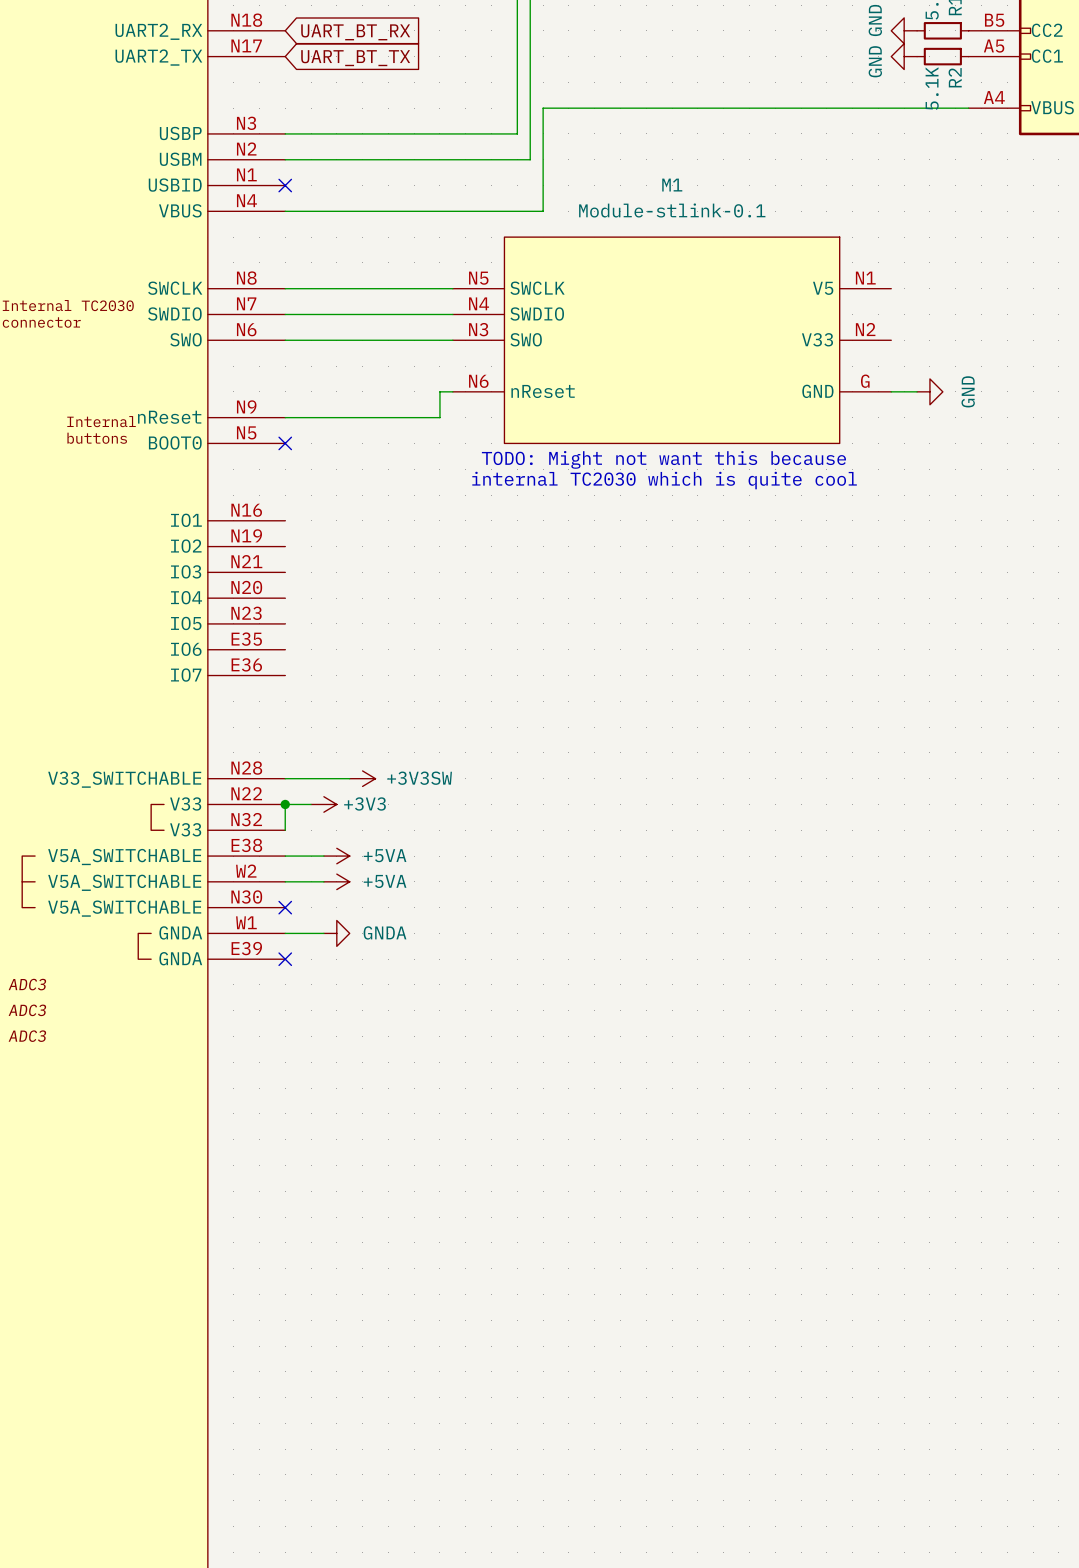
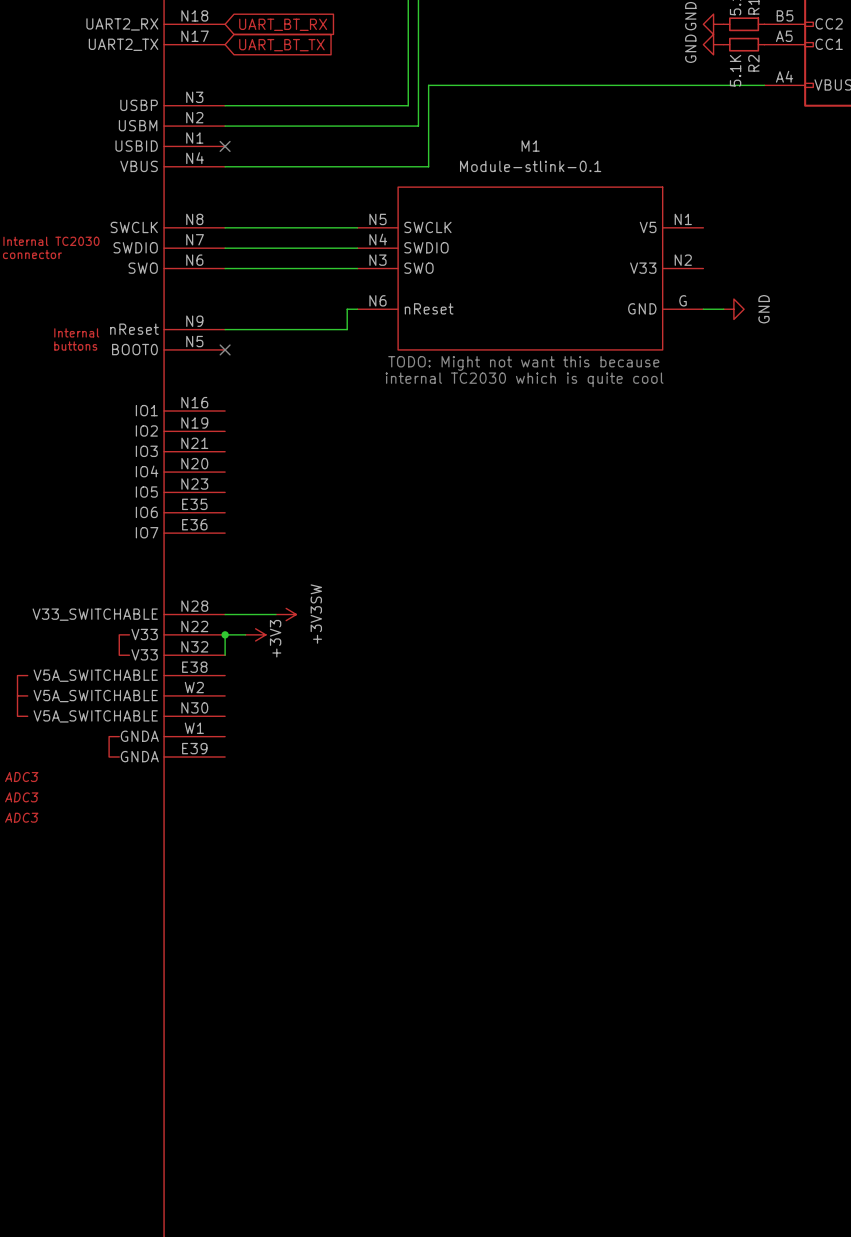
power symbol text rotation: 0° (419, 778) -> 90° counterclockwise (316, 614)
power symbol text rotation: 0° (364, 803) -> 90° counterclockwise (275, 638)
wire: (285, 856) (323, 856) -> none
power symbol: +5VA (336, 856) -> none
wire: (285, 881) (323, 881) -> none
power symbol: +5VA (336, 881) -> none
no-connect mark: (285, 907) -> none
wire: (285, 933) (323, 933) -> none
power symbol: GNDA (336, 933) -> none
no-connect mark: (285, 959) -> none

